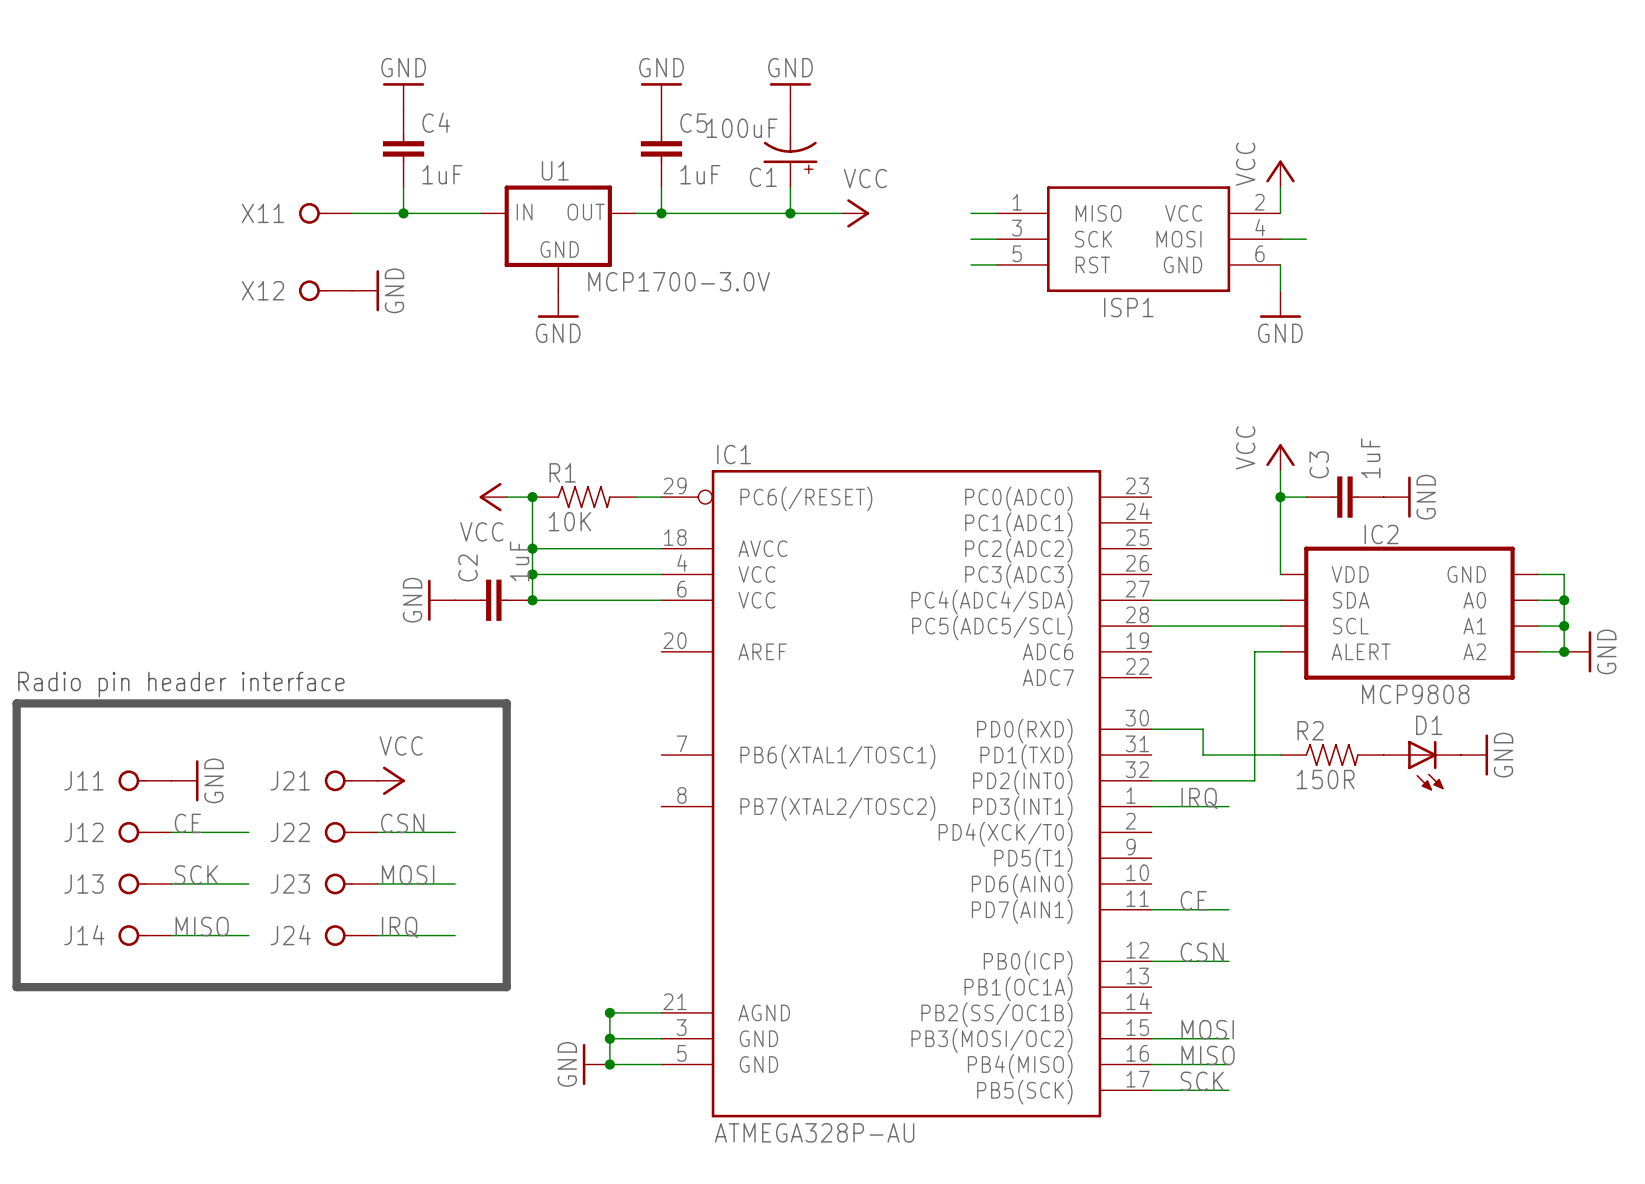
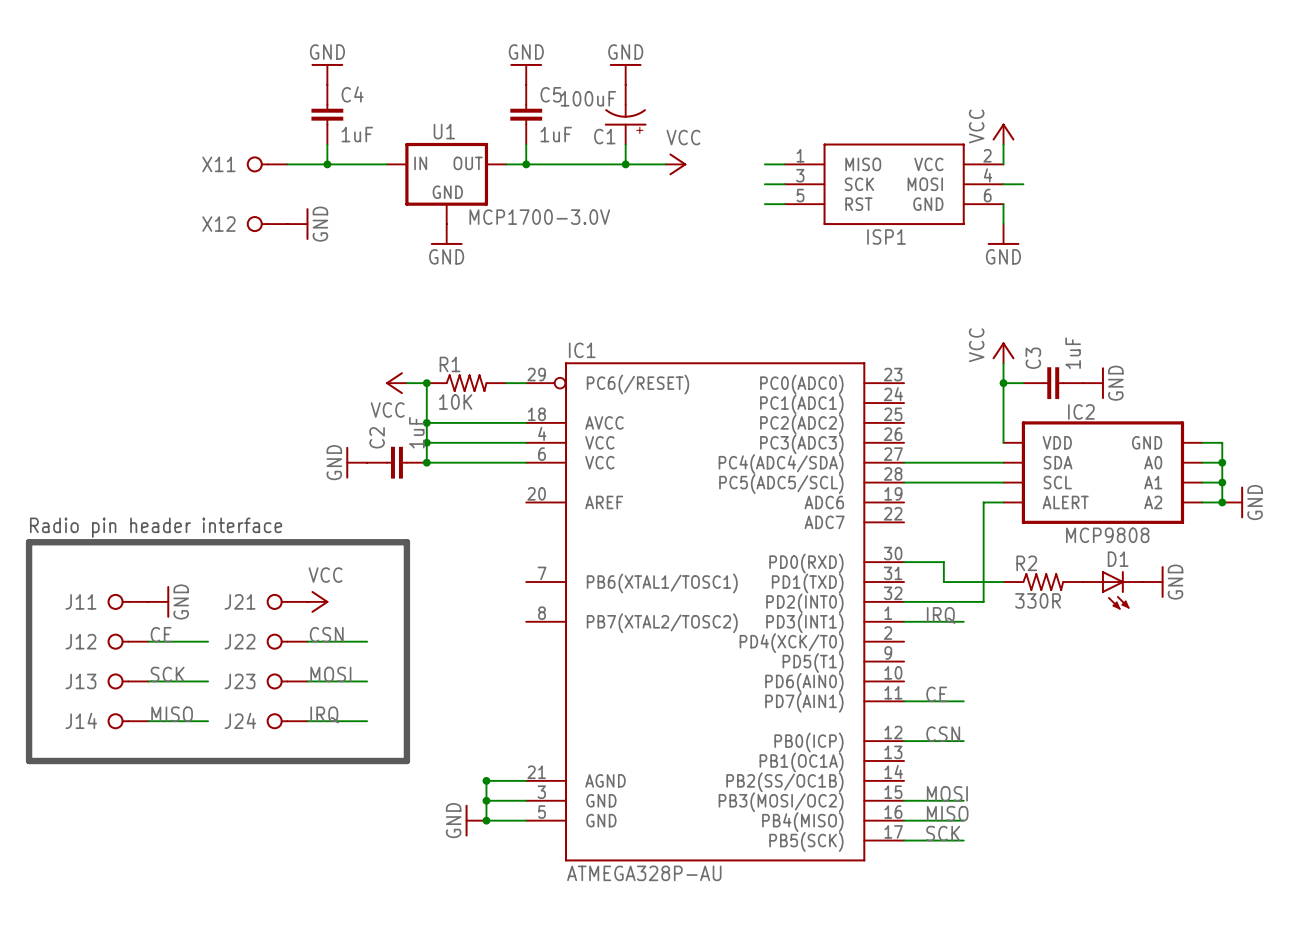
R2 value: 150R (1325, 779) -> 330R (1038, 600)

